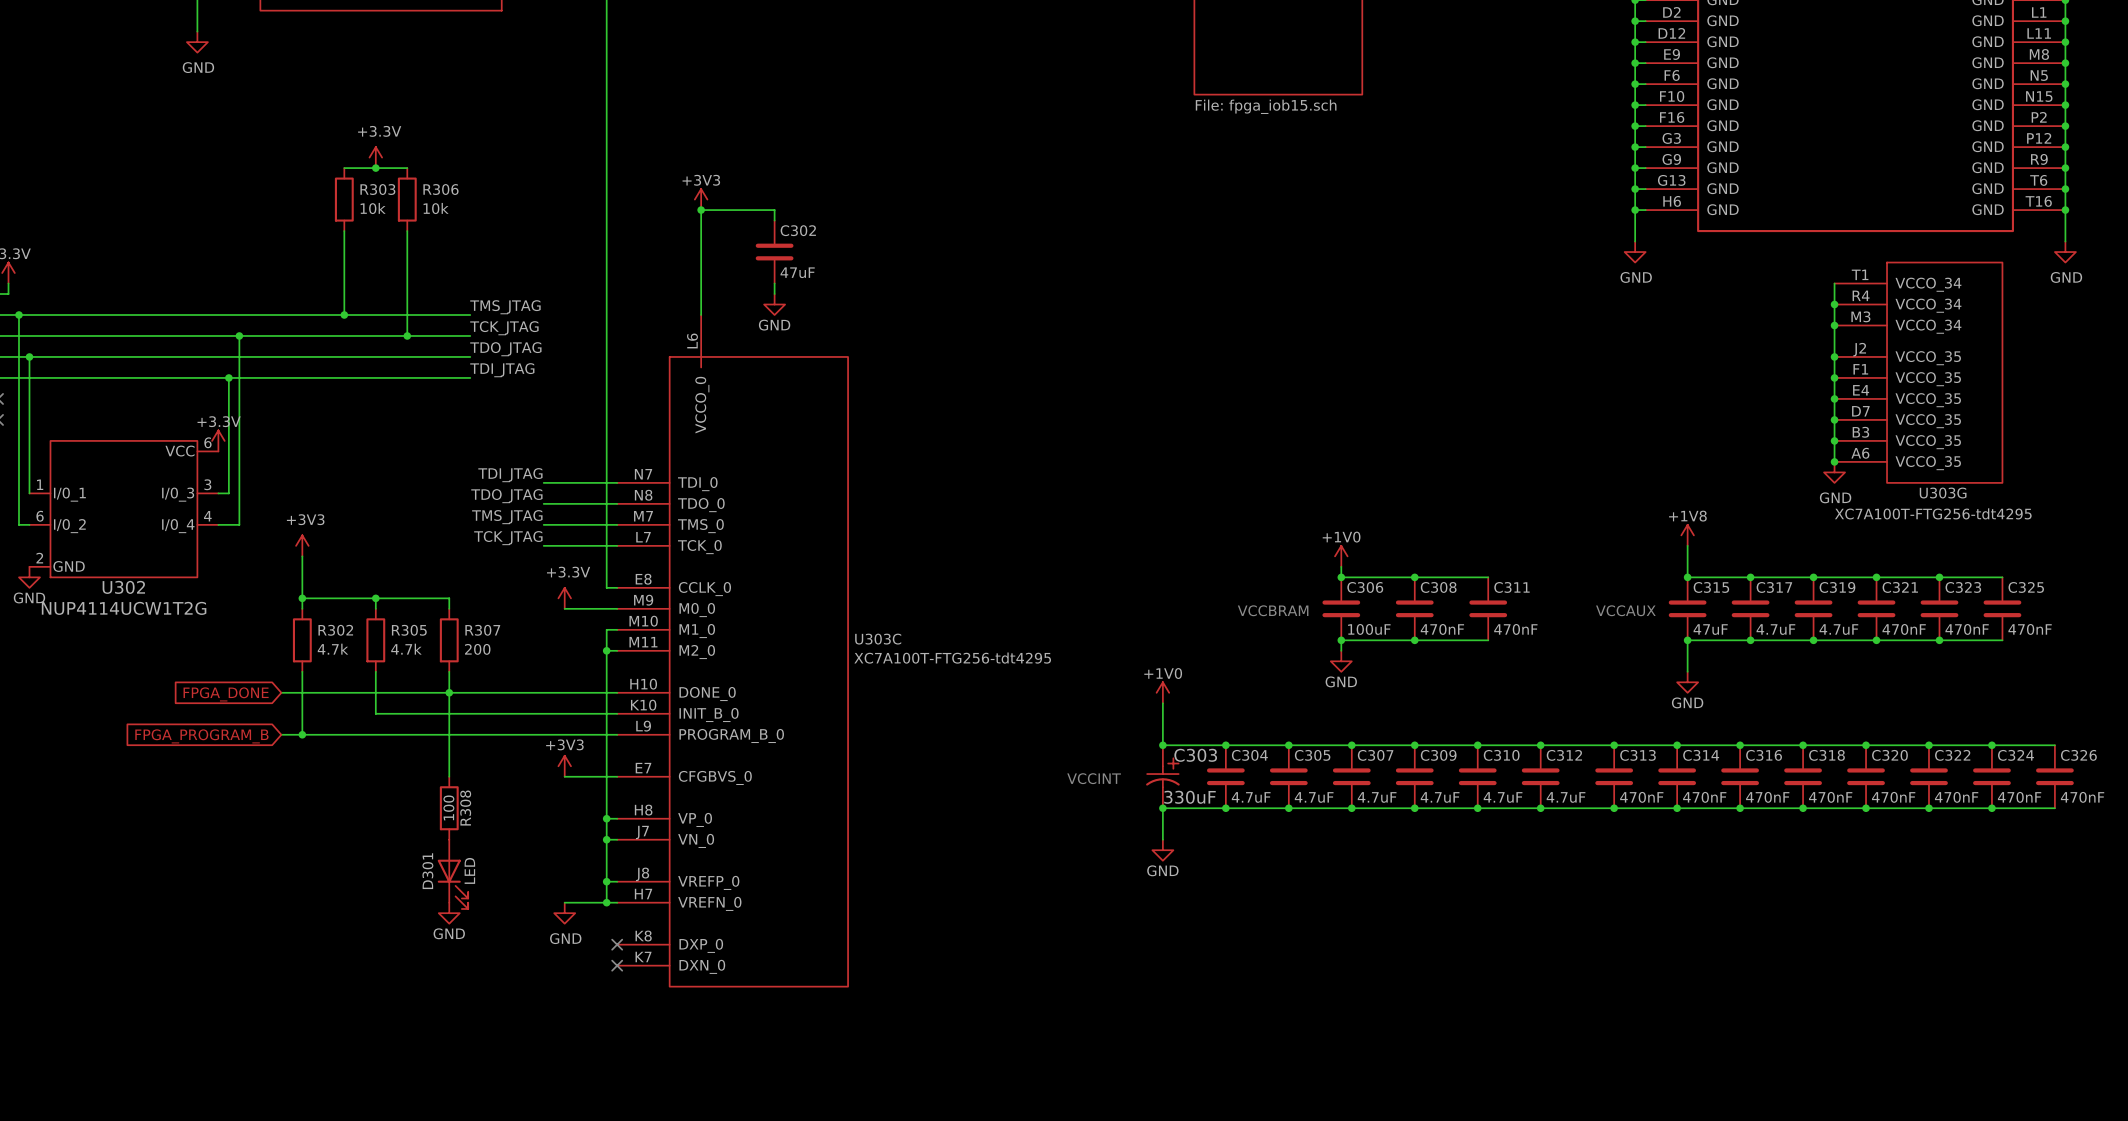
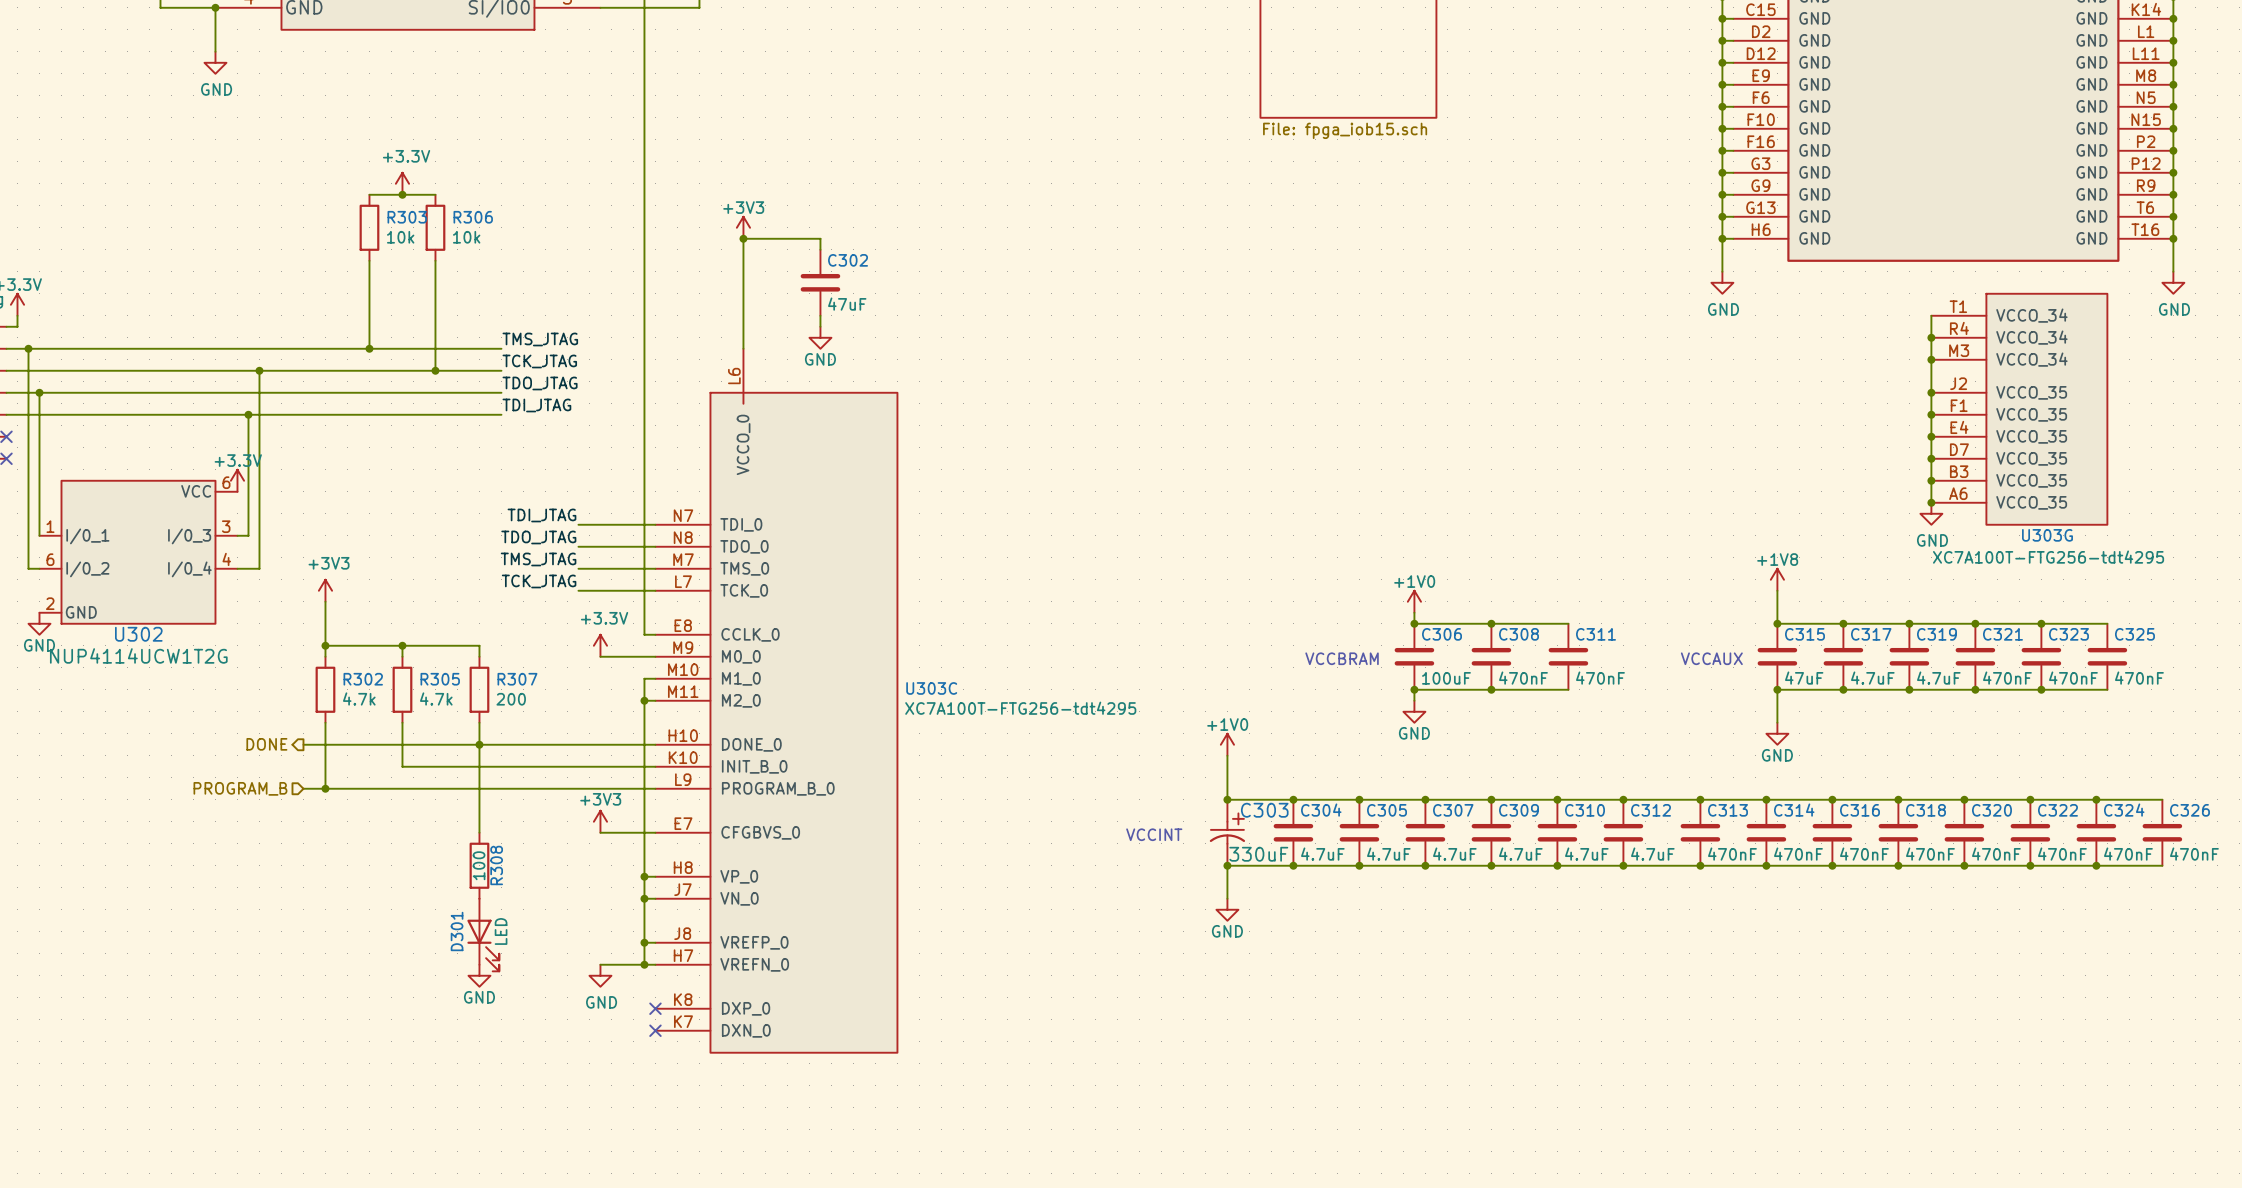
hierarchical label: none -> DONE (266, 744)
global label: FPGA_DONE (226, 694) -> none
hierarchical label: none -> PROGRAM_B (240, 788)
global label: FPGA_PROGRAM_B (201, 736) -> none

